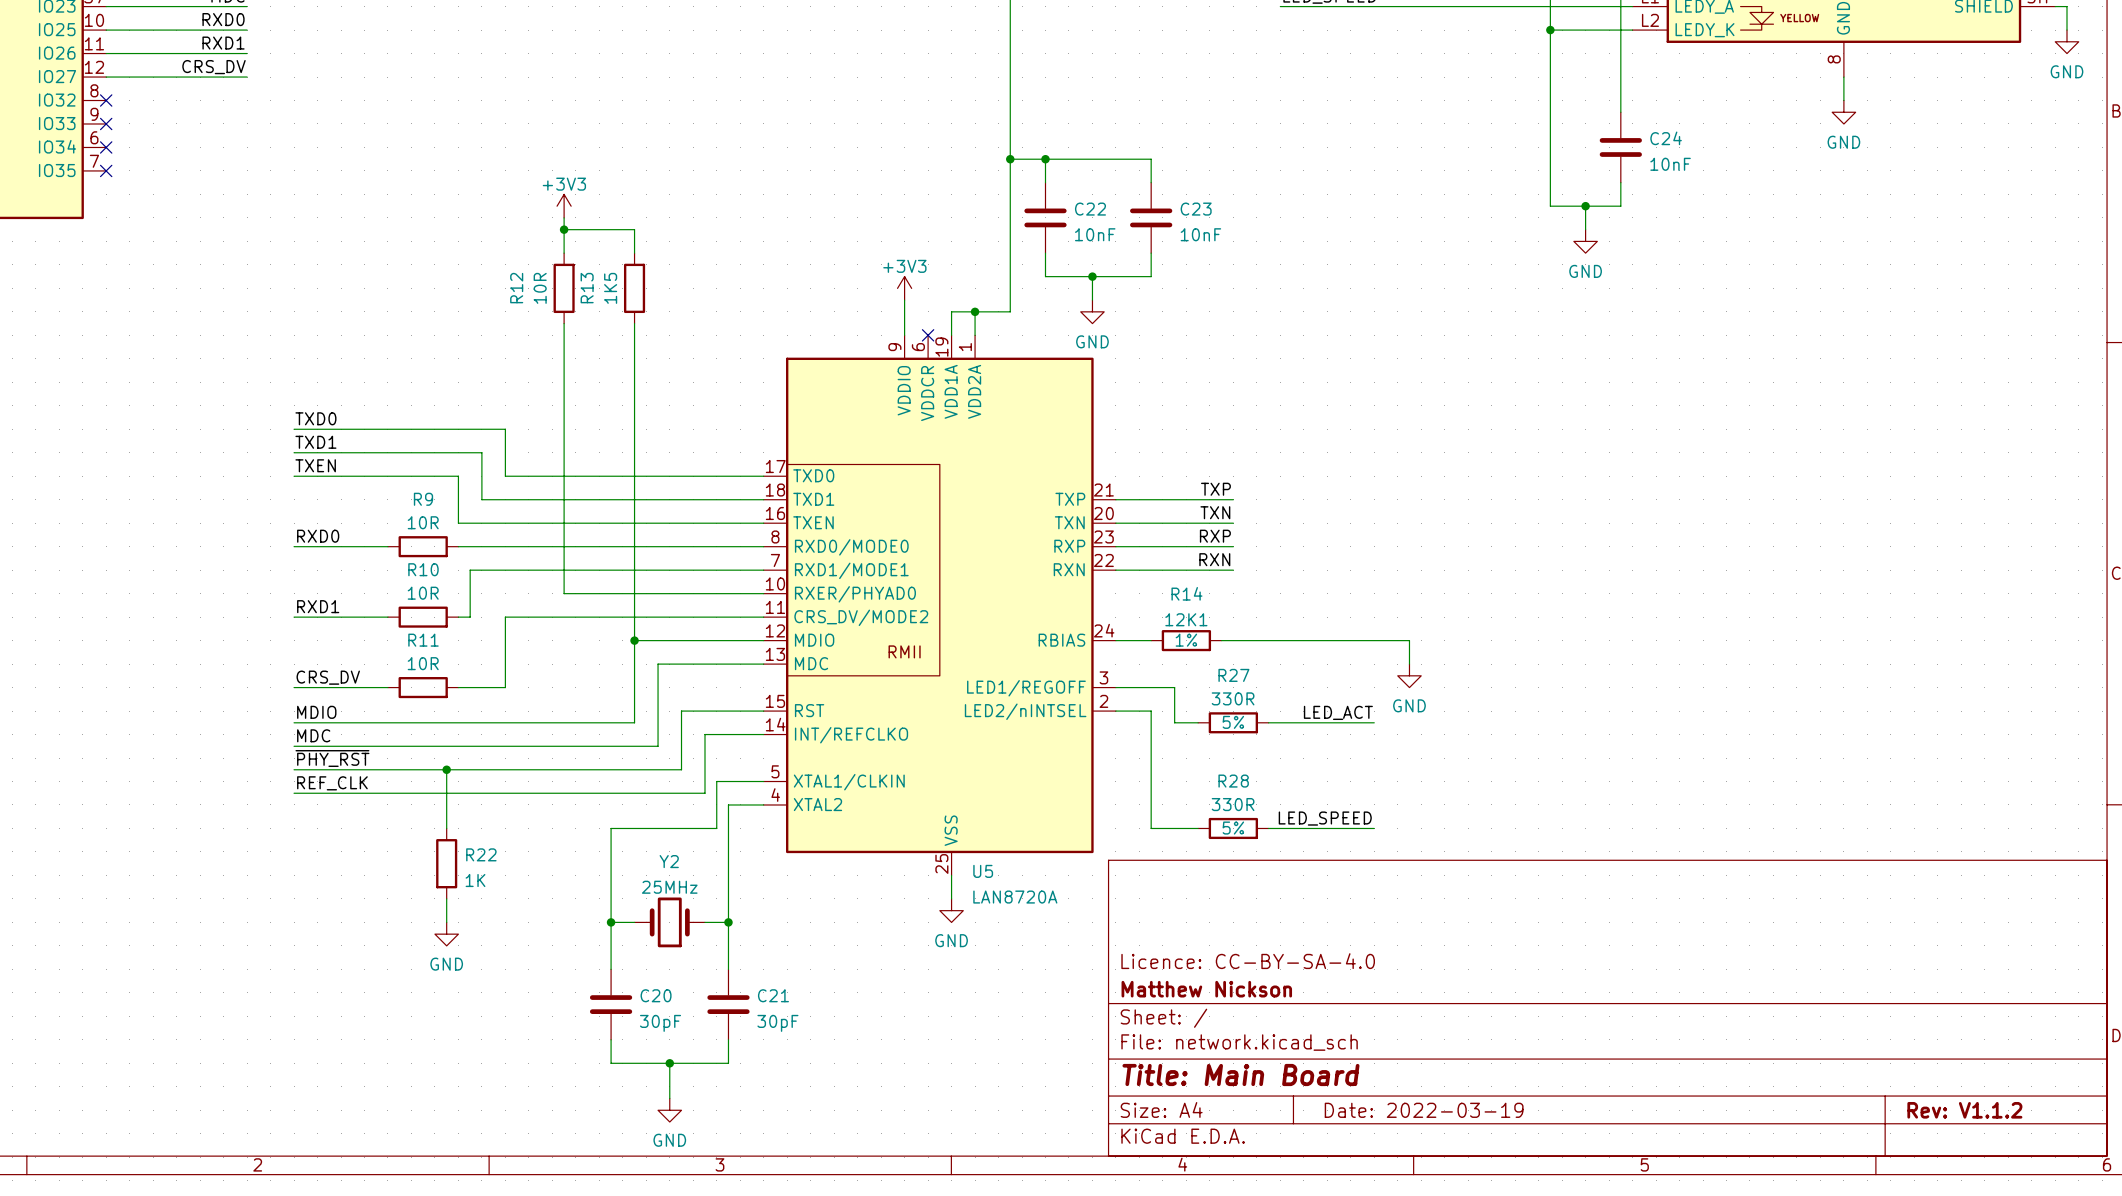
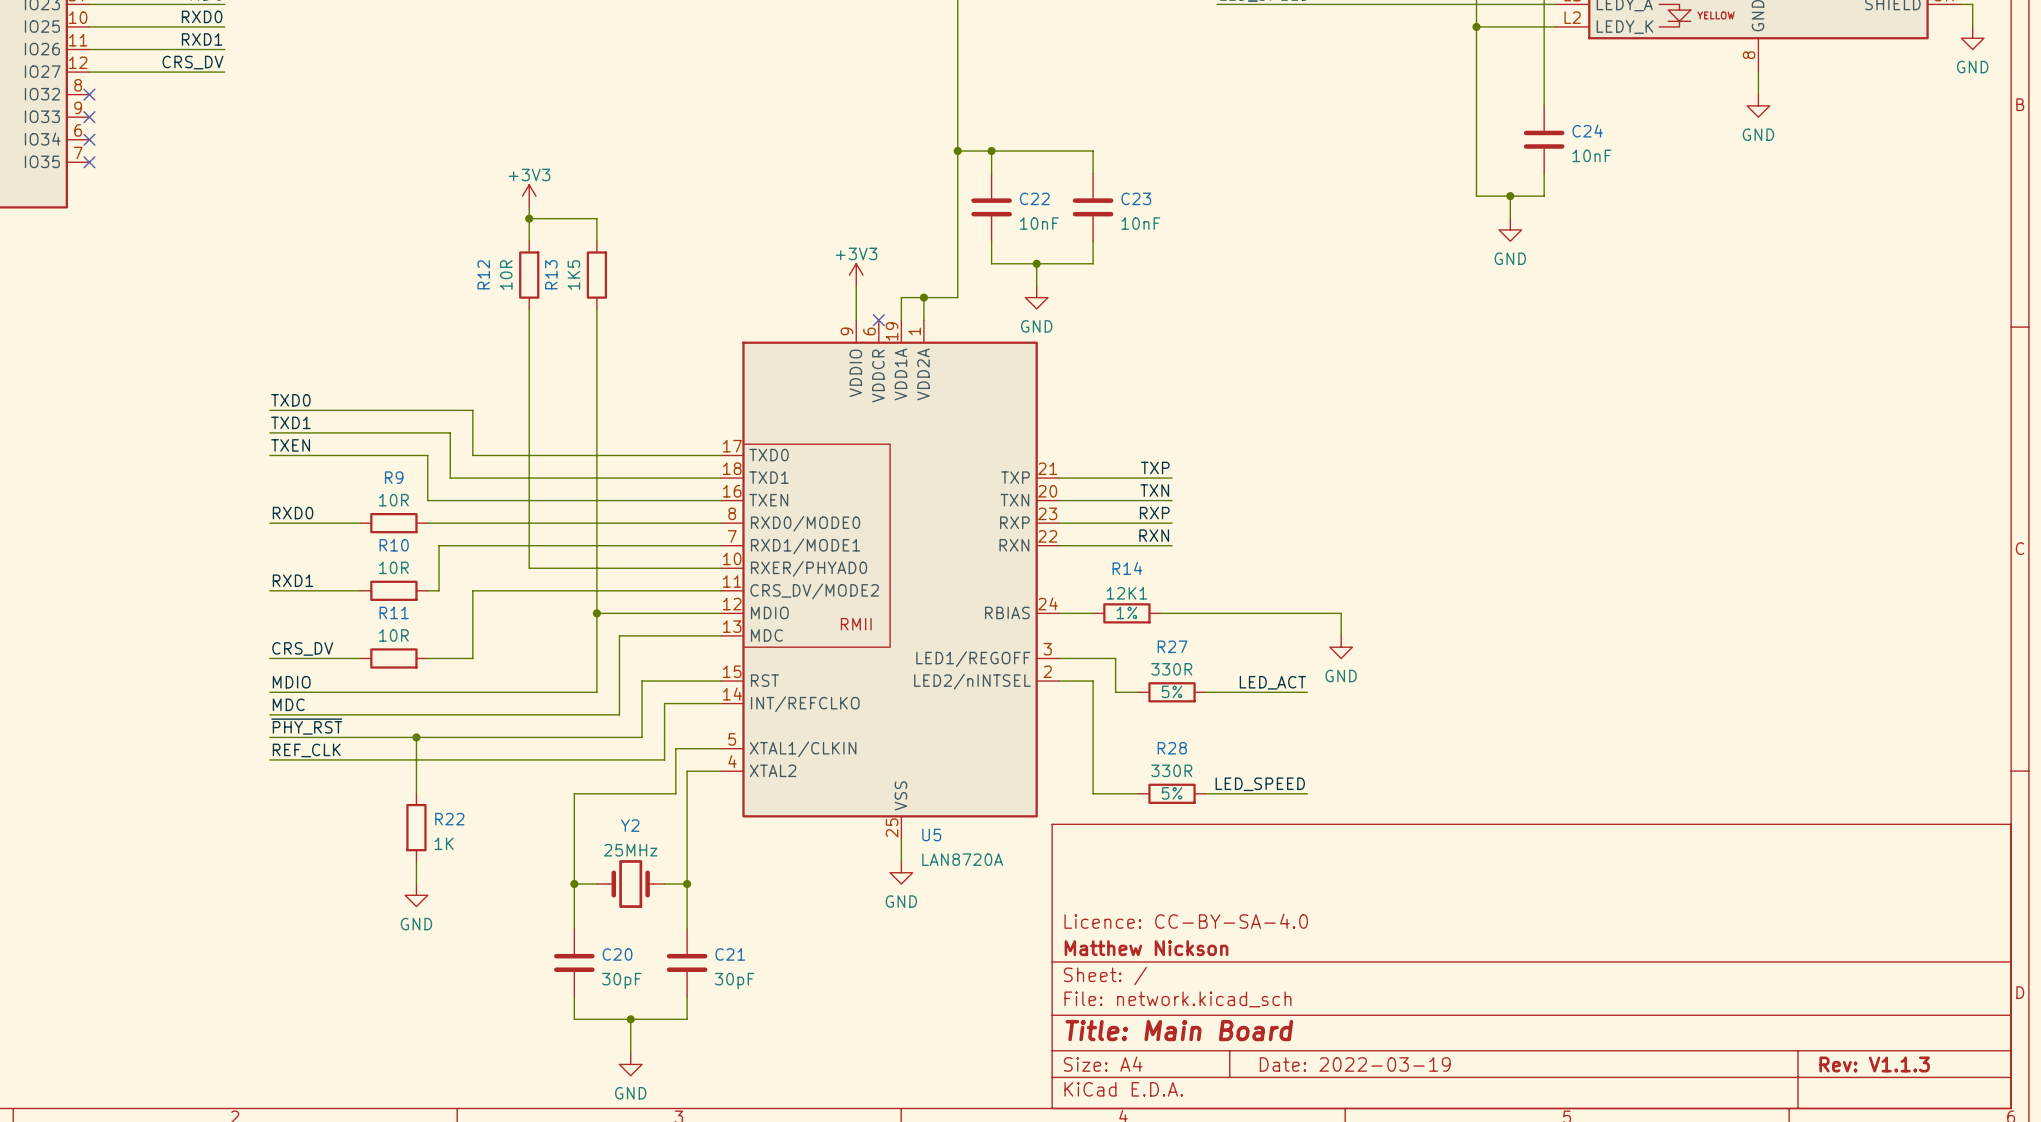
title block: Rev: V1.1.2 (1964, 1110) -> Rev: V1.1.3 (1874, 1064)

